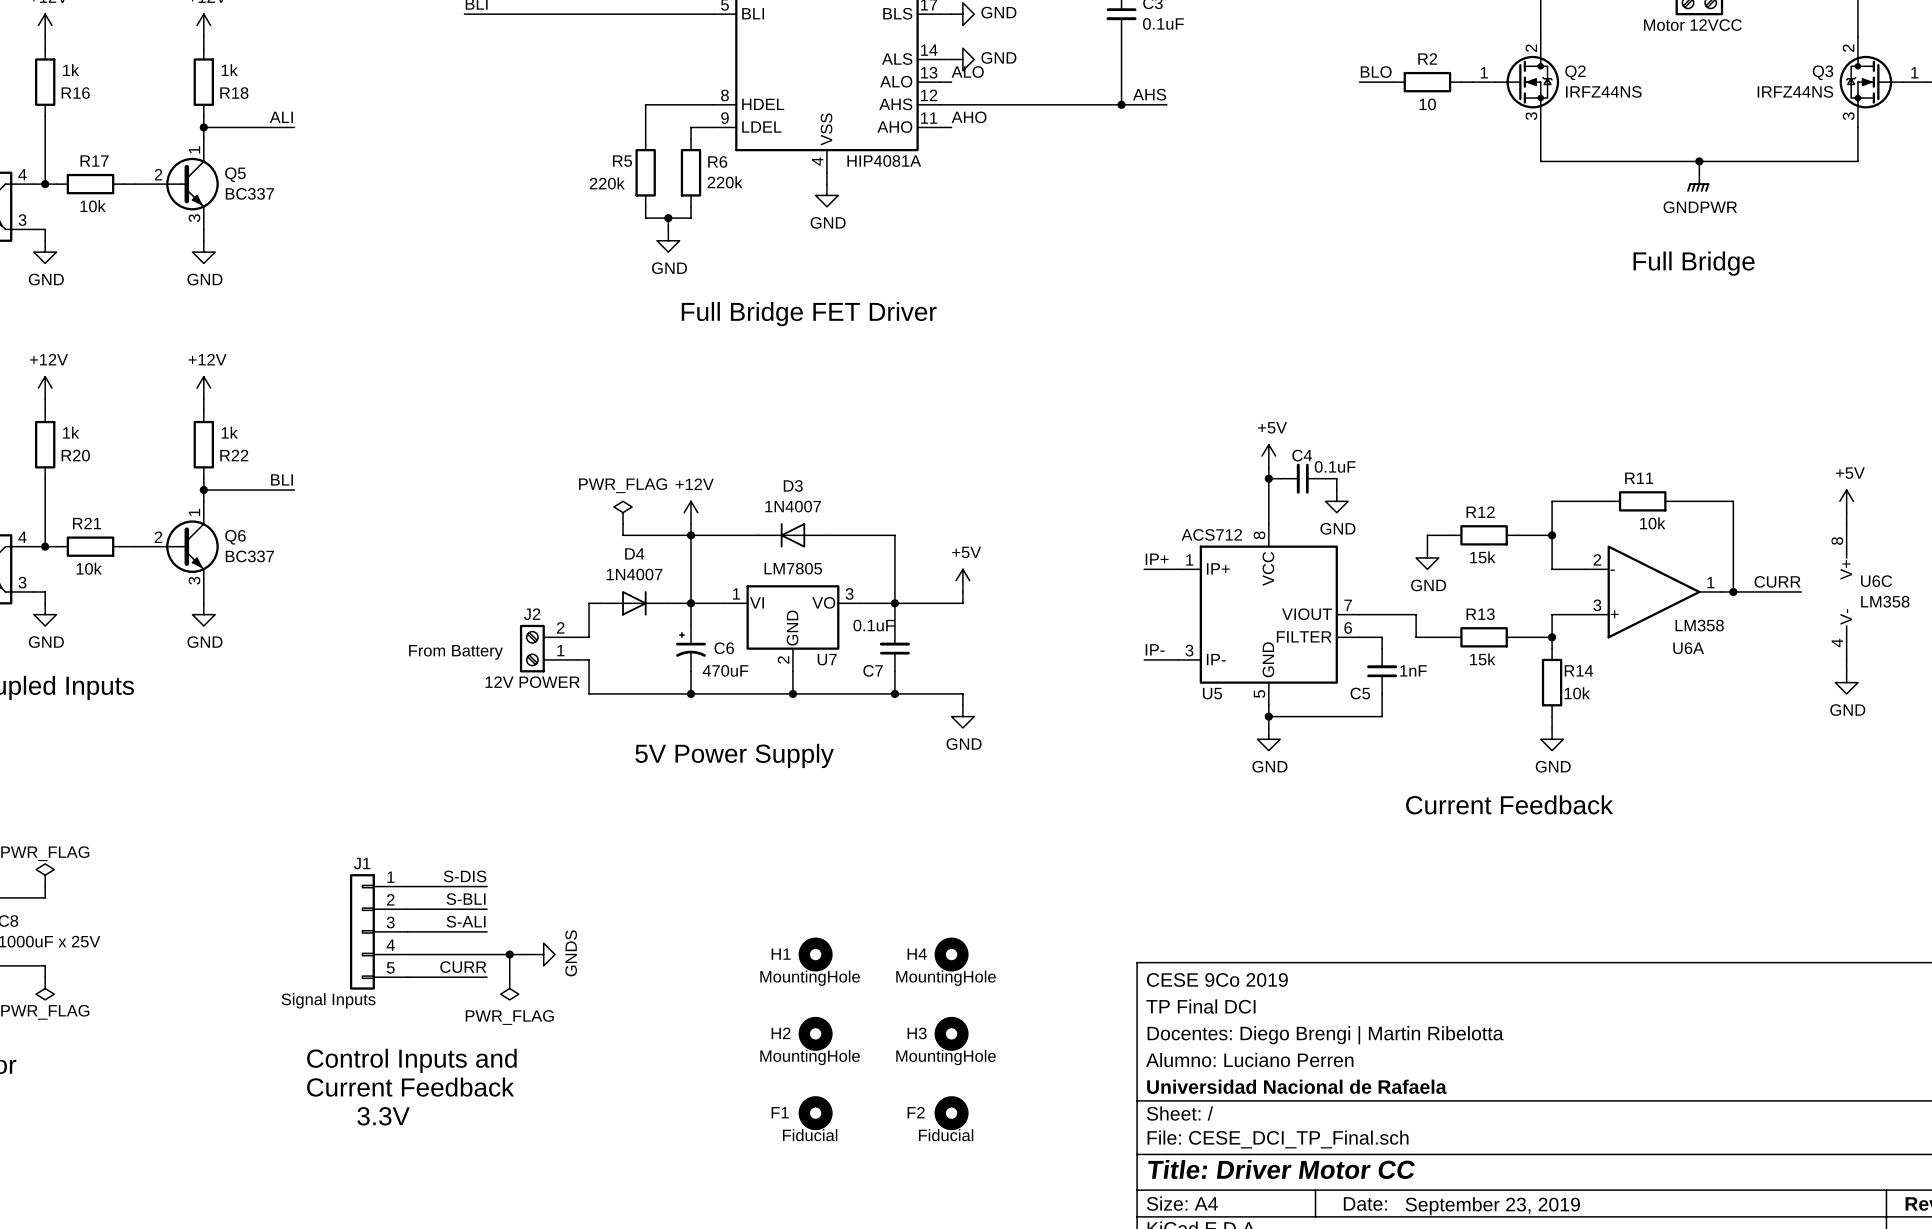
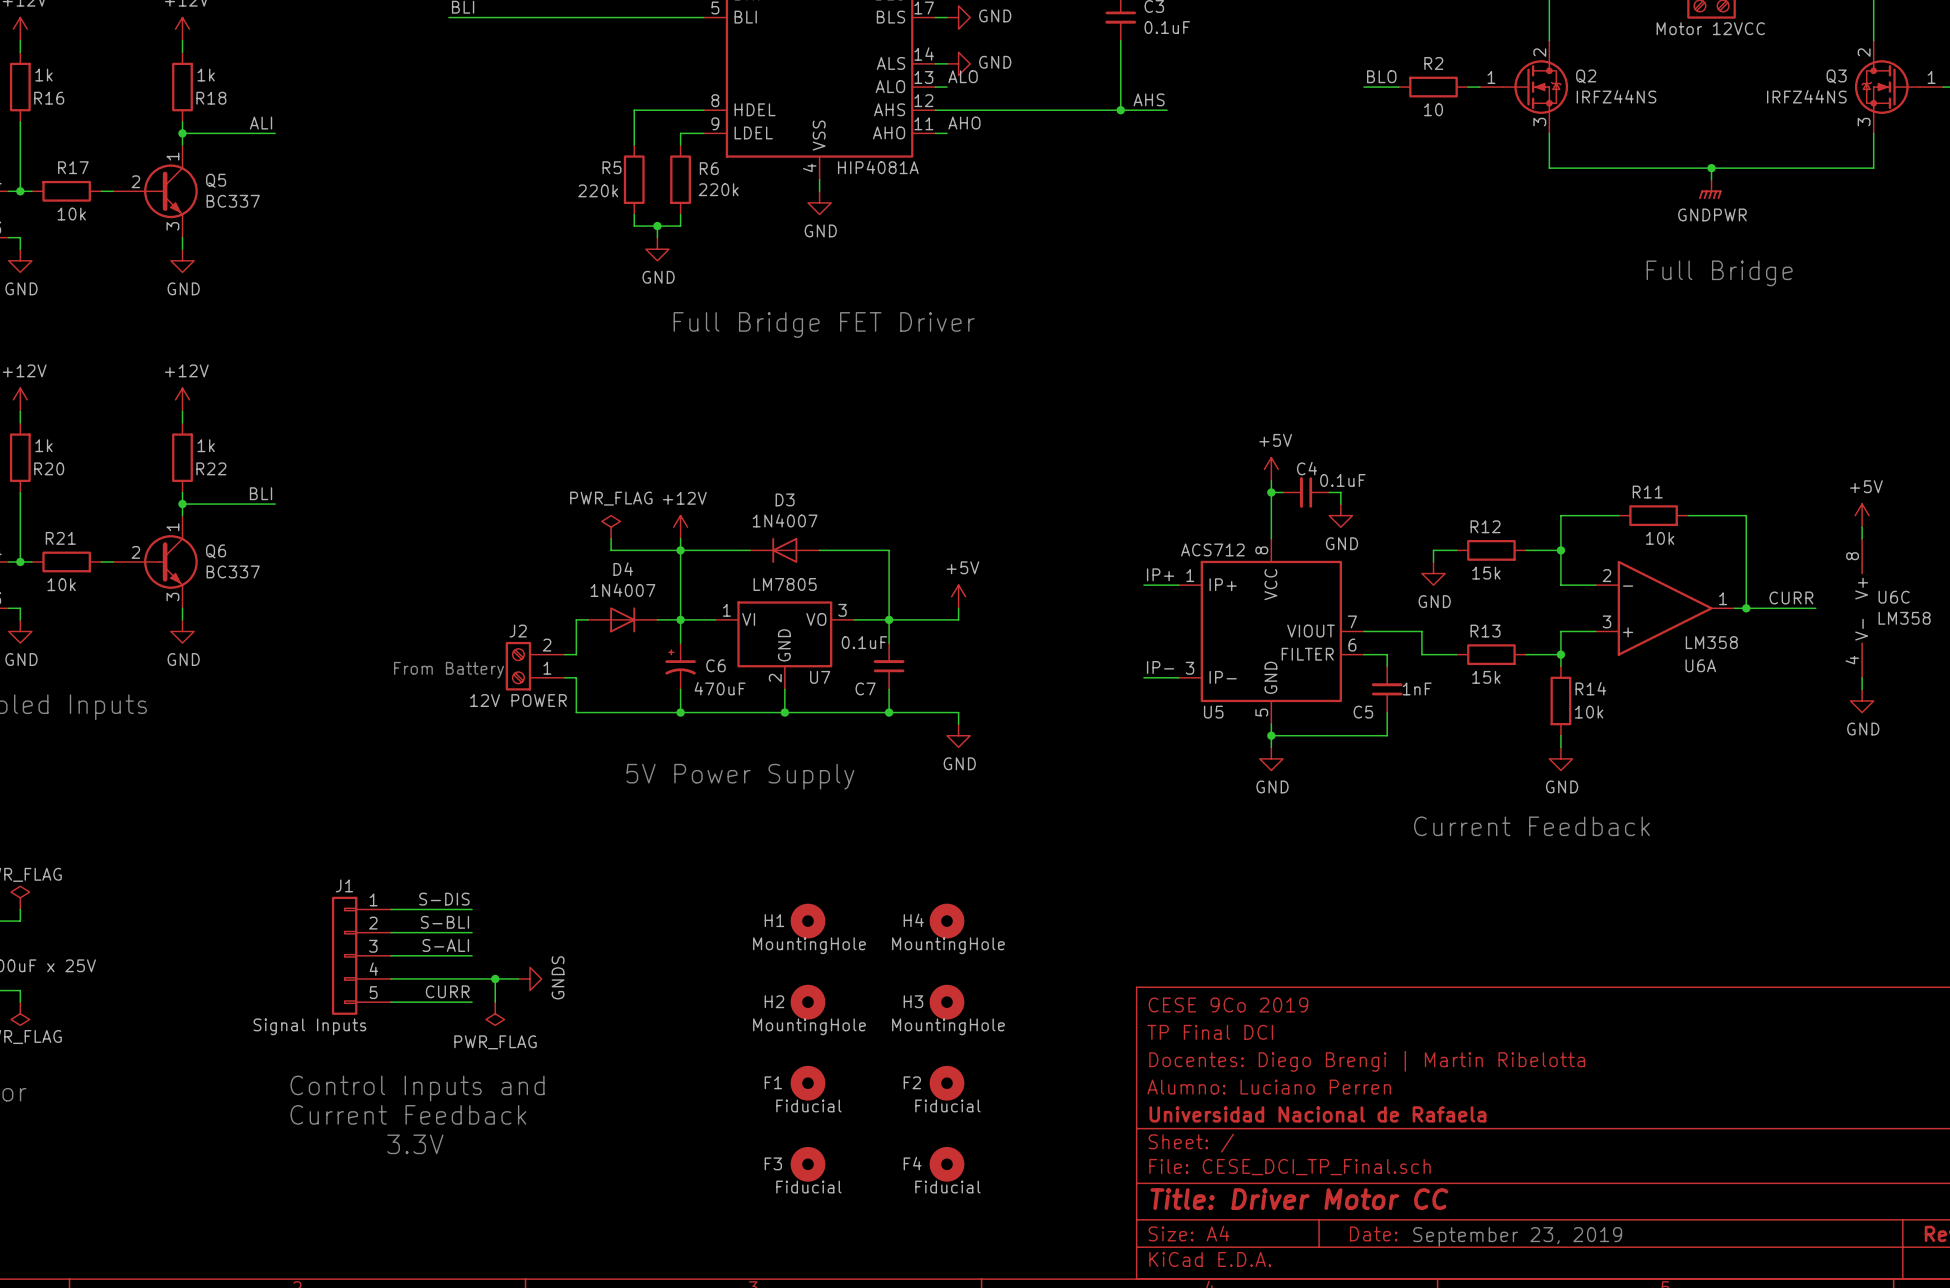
H1 position: (815, 954) -> (808, 921)
H4 position: (951, 954) -> (947, 921)
H2 position: (815, 1033) -> (808, 1002)
H3 position: (951, 1033) -> (947, 1002)
F1 position: (815, 1113) -> (808, 1083)
F2 position: (951, 1113) -> (947, 1083)
F3: none -> Fiducial (808, 1164)
F4: none -> Fiducial (947, 1164)

